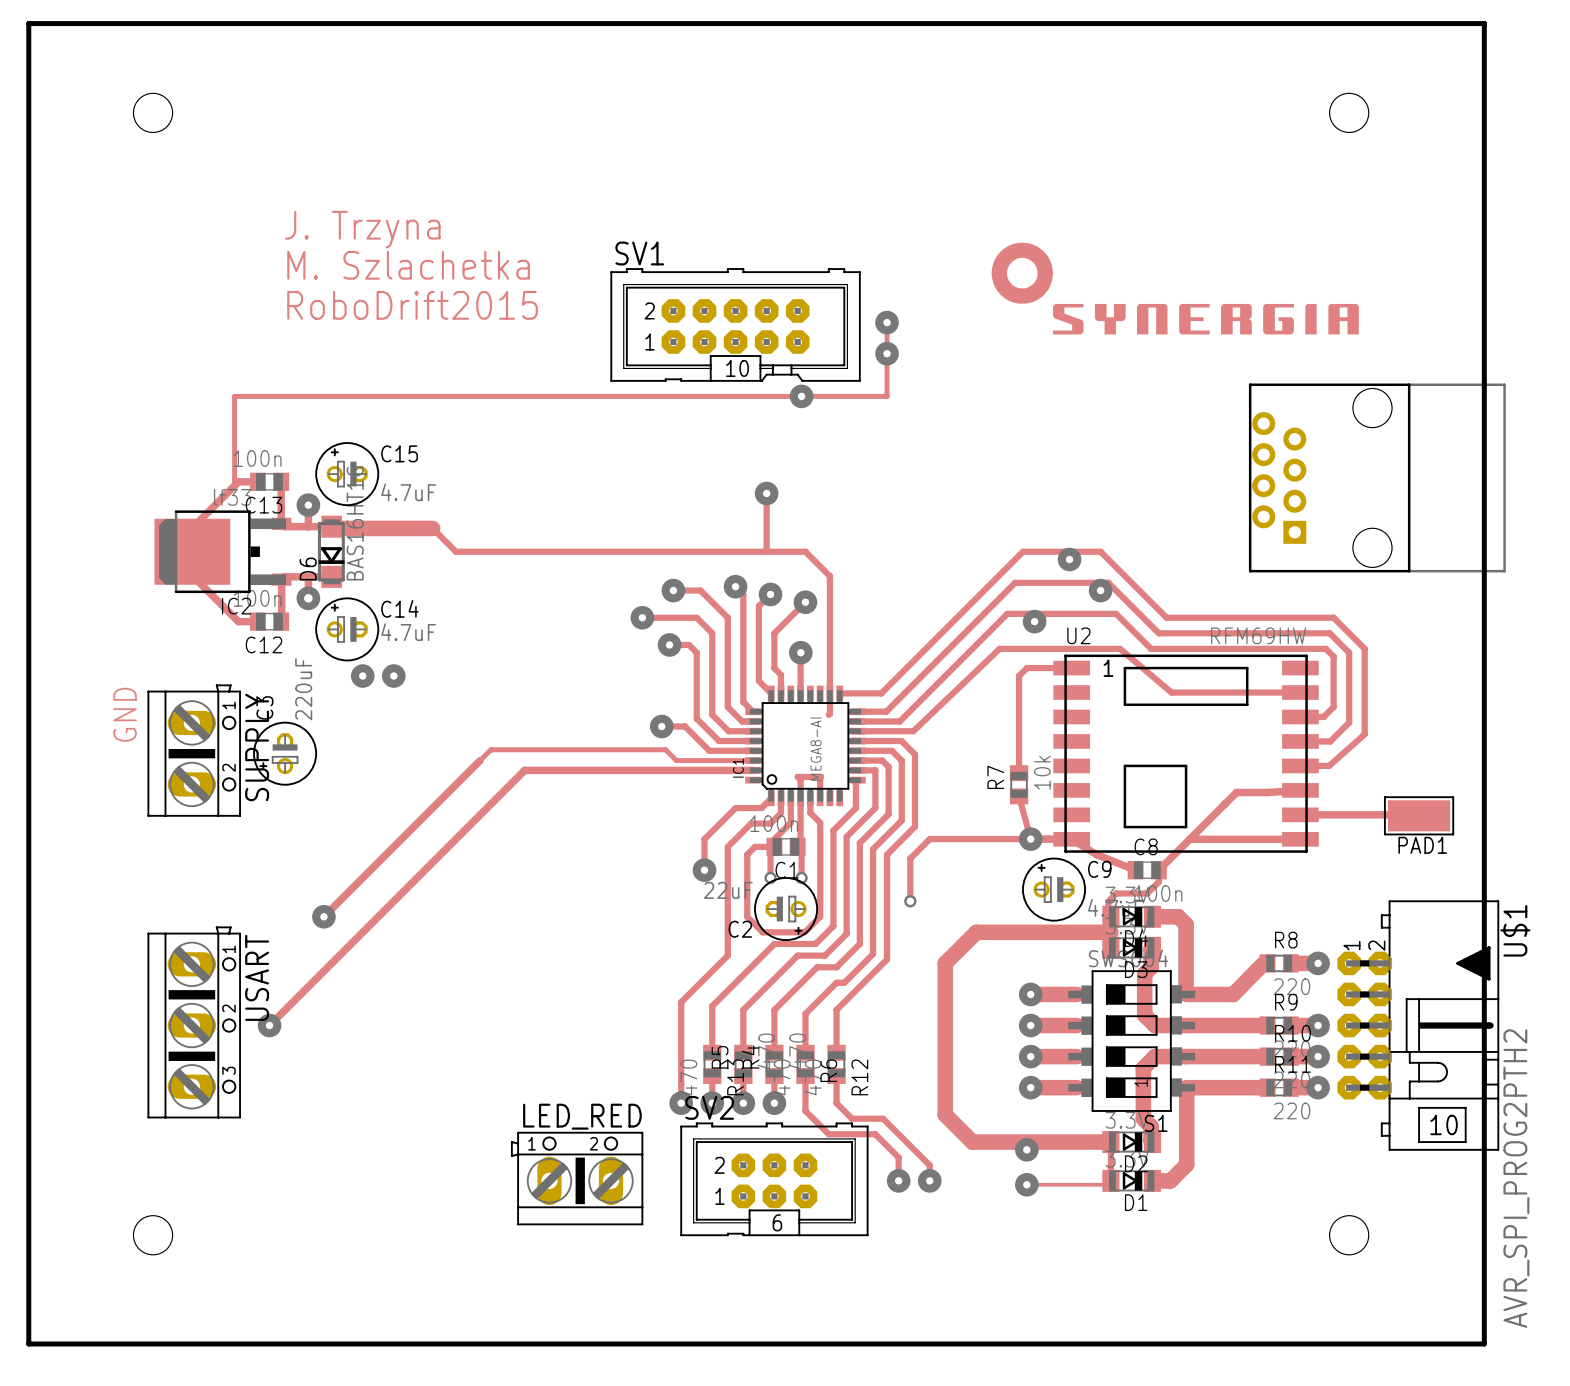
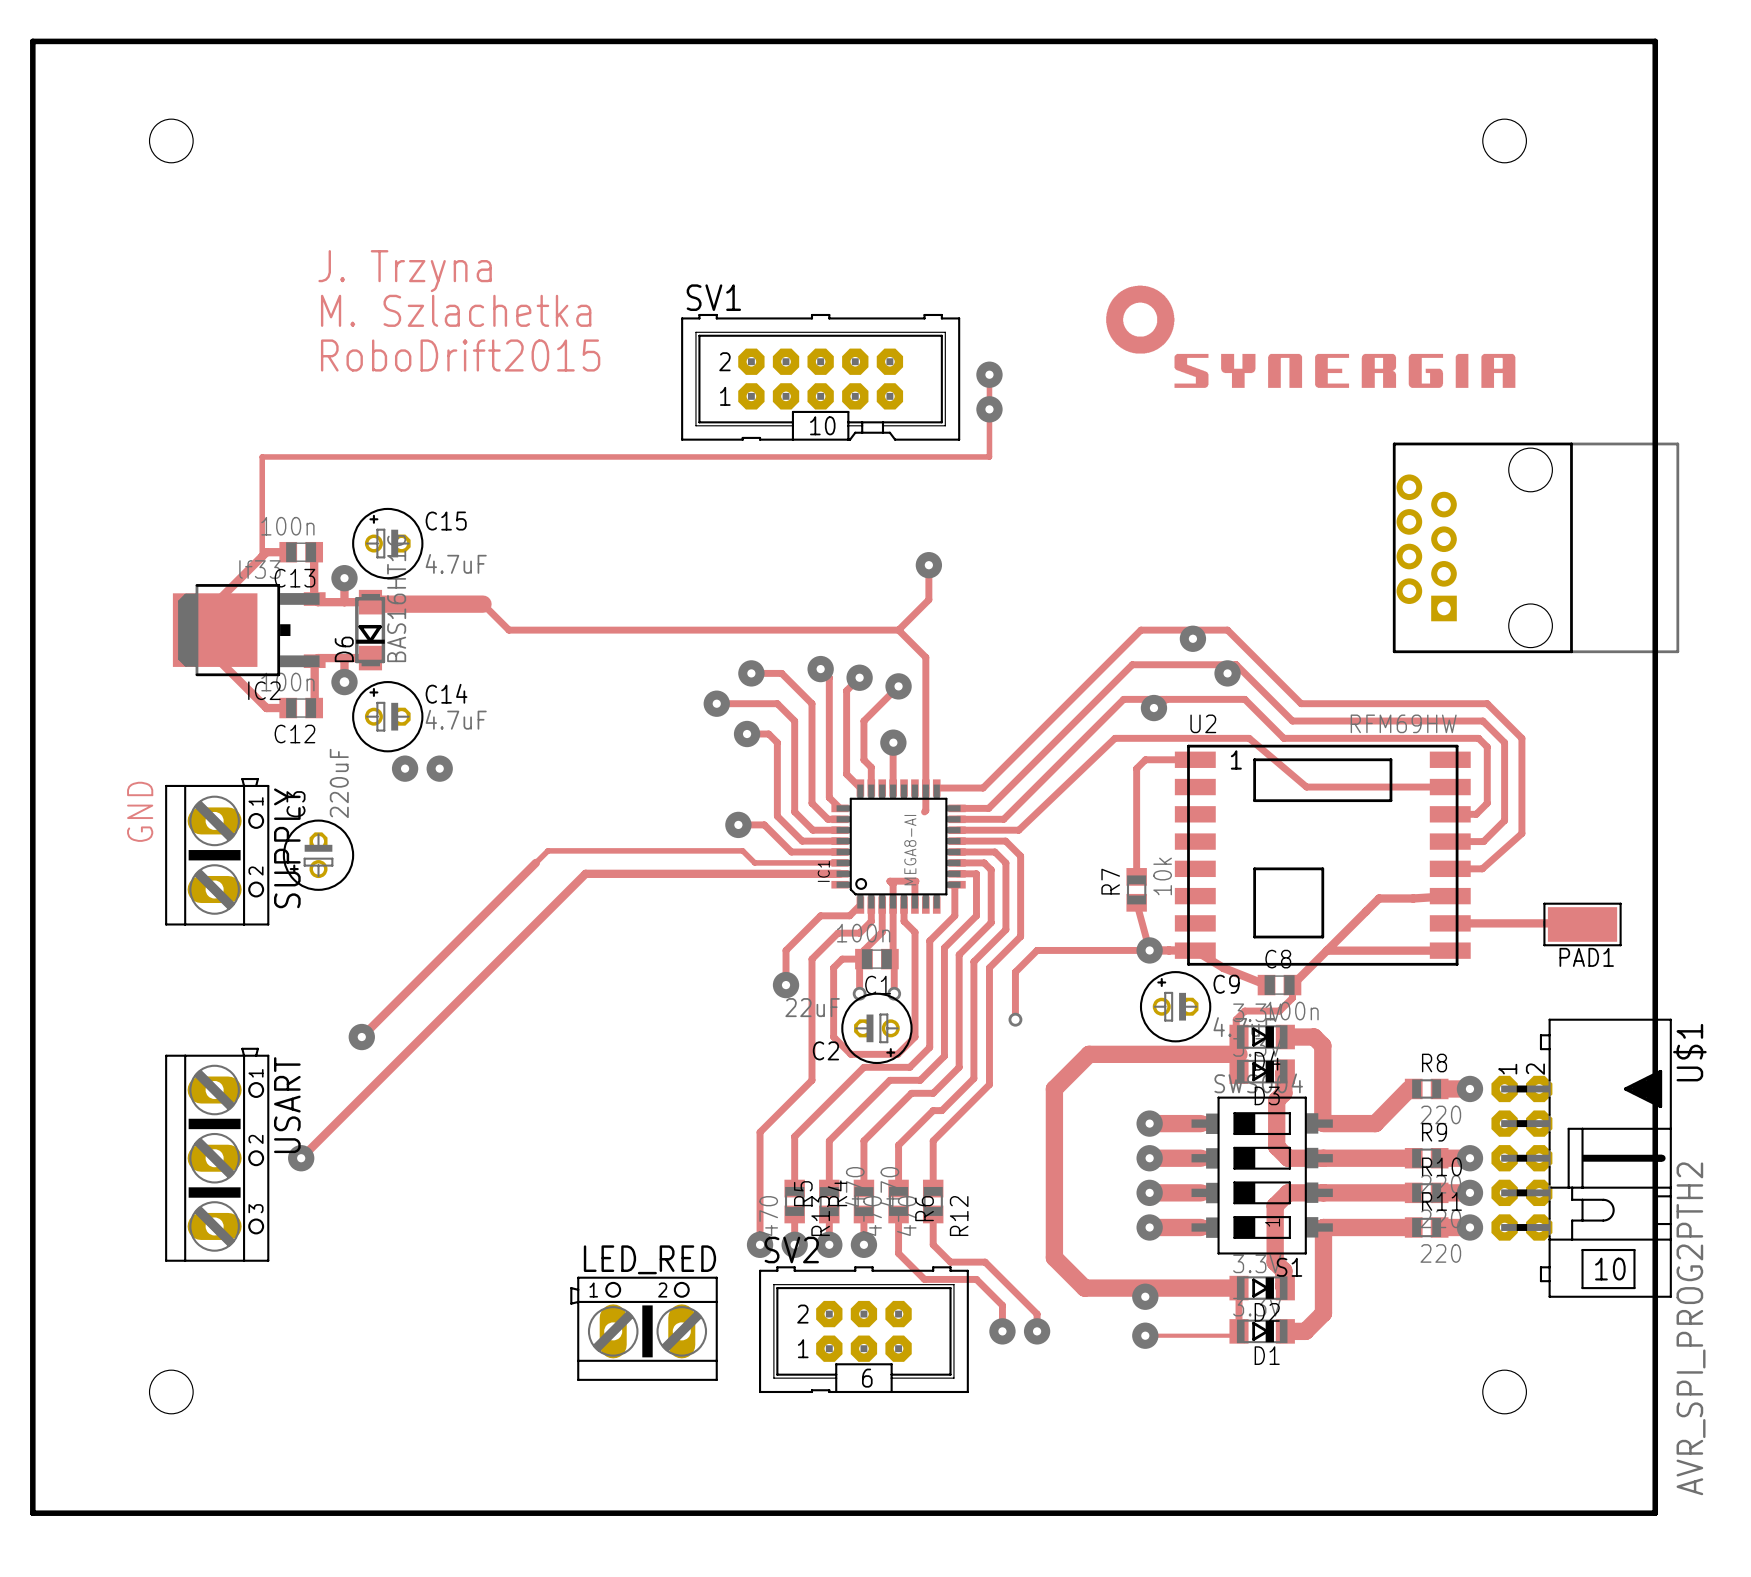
via: (801, 396) -> none
track: (766, 493) (766, 551) -> none
via: (766, 493) -> none
track: none -> (928, 565) (928, 599) (898, 630)
via: none -> (928, 565)

